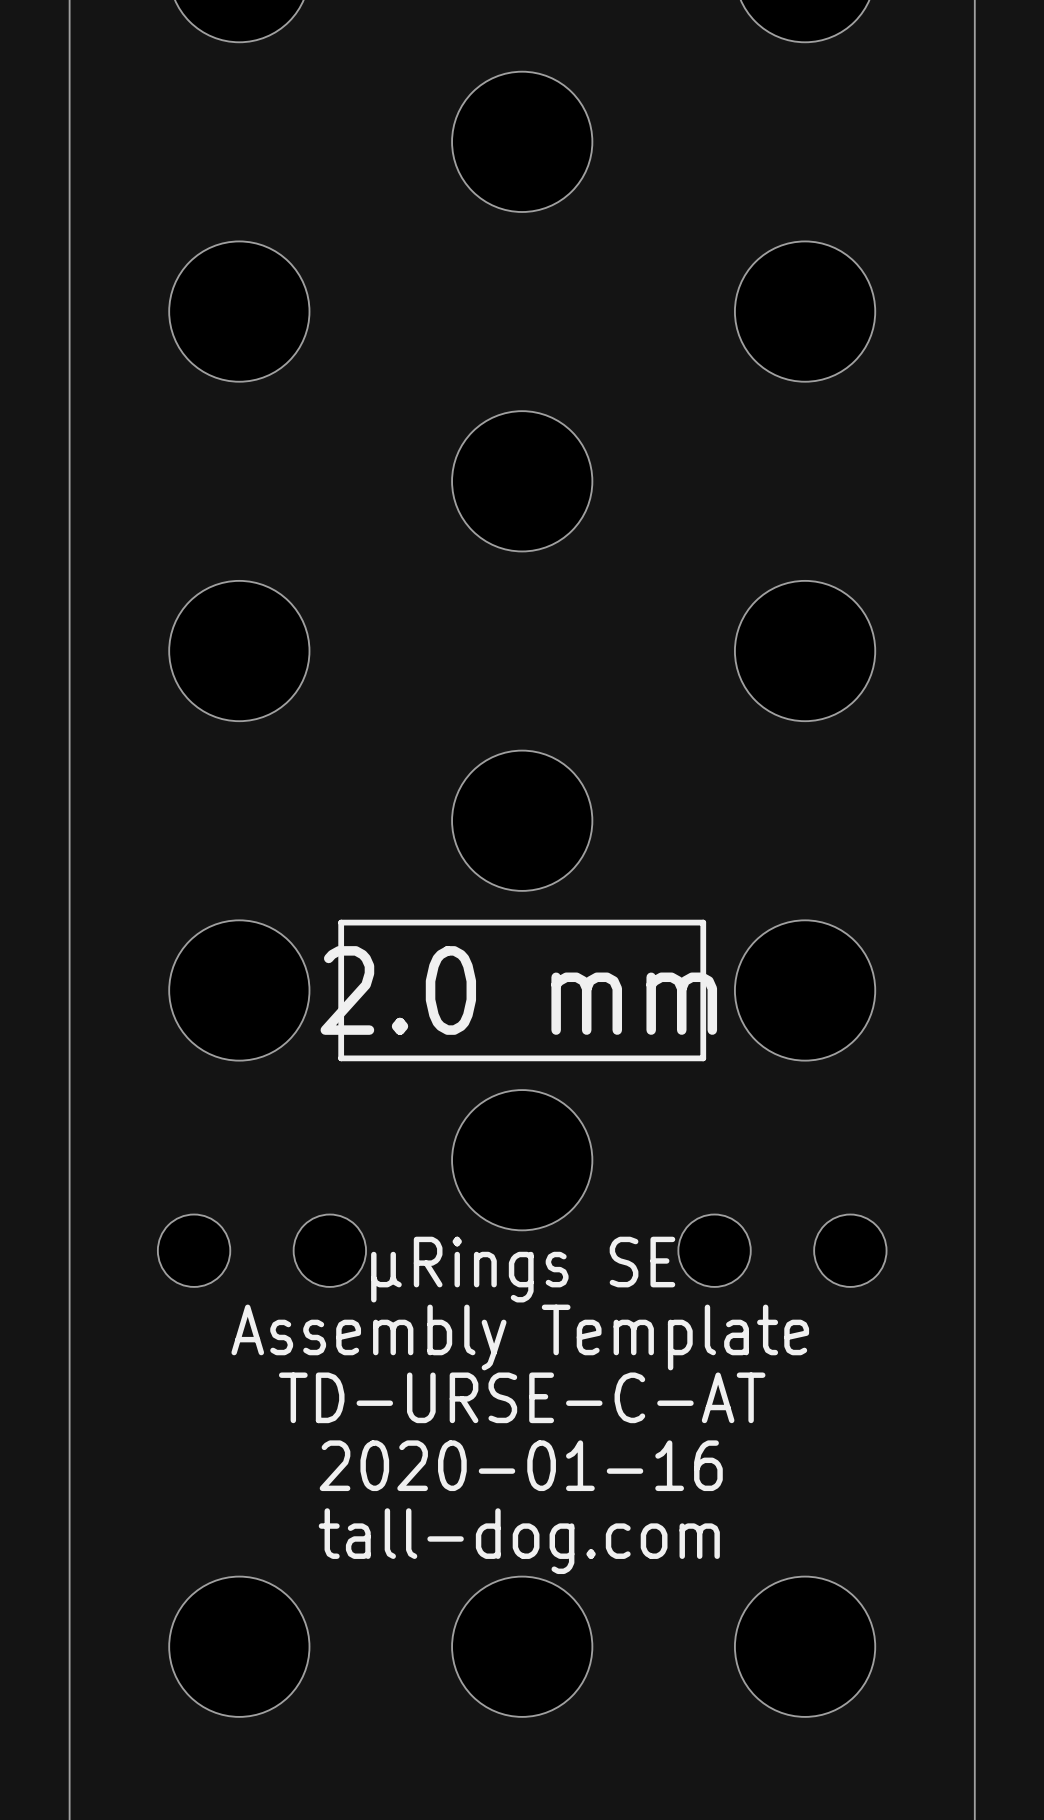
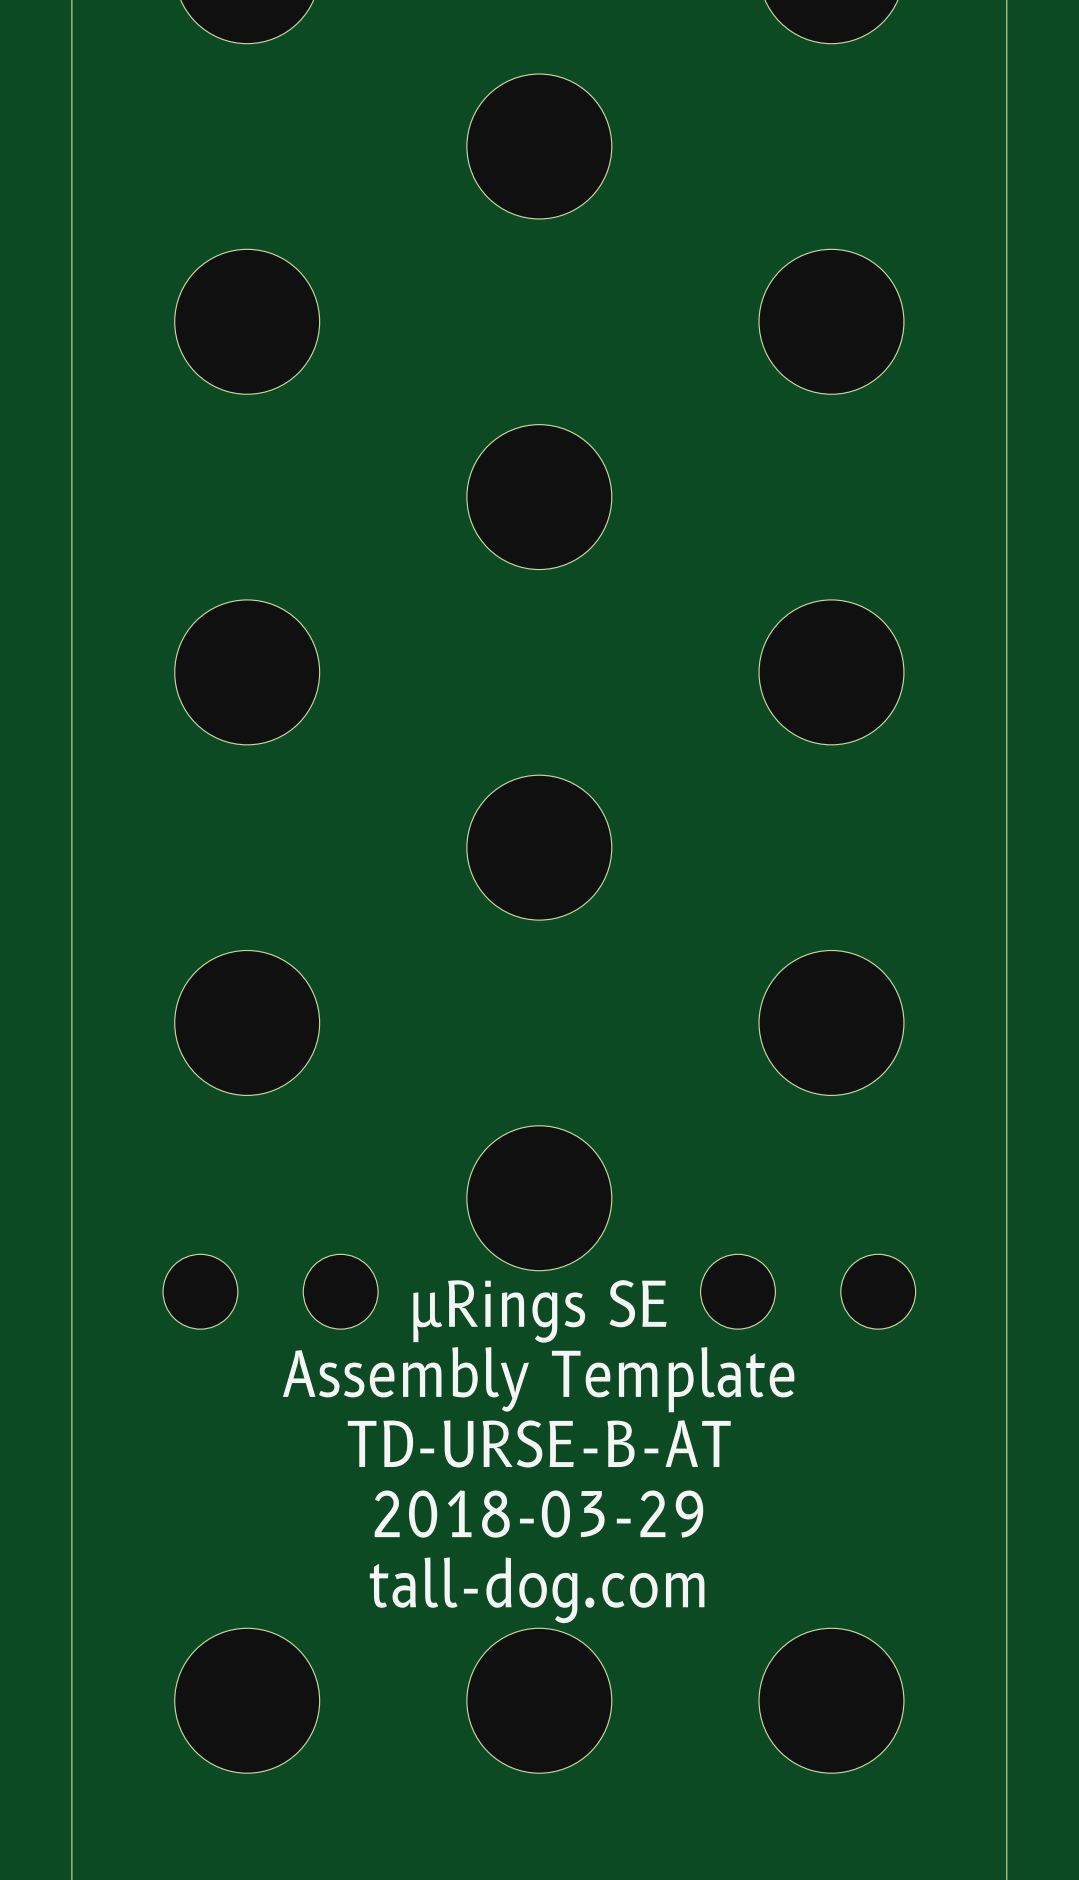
line: (341, 922) (703, 922) (703, 1058) (341, 1058) (341, 922) -> none
text: 2.0 mm (518, 990) -> none
text: TD-URSE-C-AT (522, 1397) -> TD-URSE-B-AT (539, 1443)
text: 2020-01-16 (521, 1465) -> 2018-03-29 (538, 1514)

